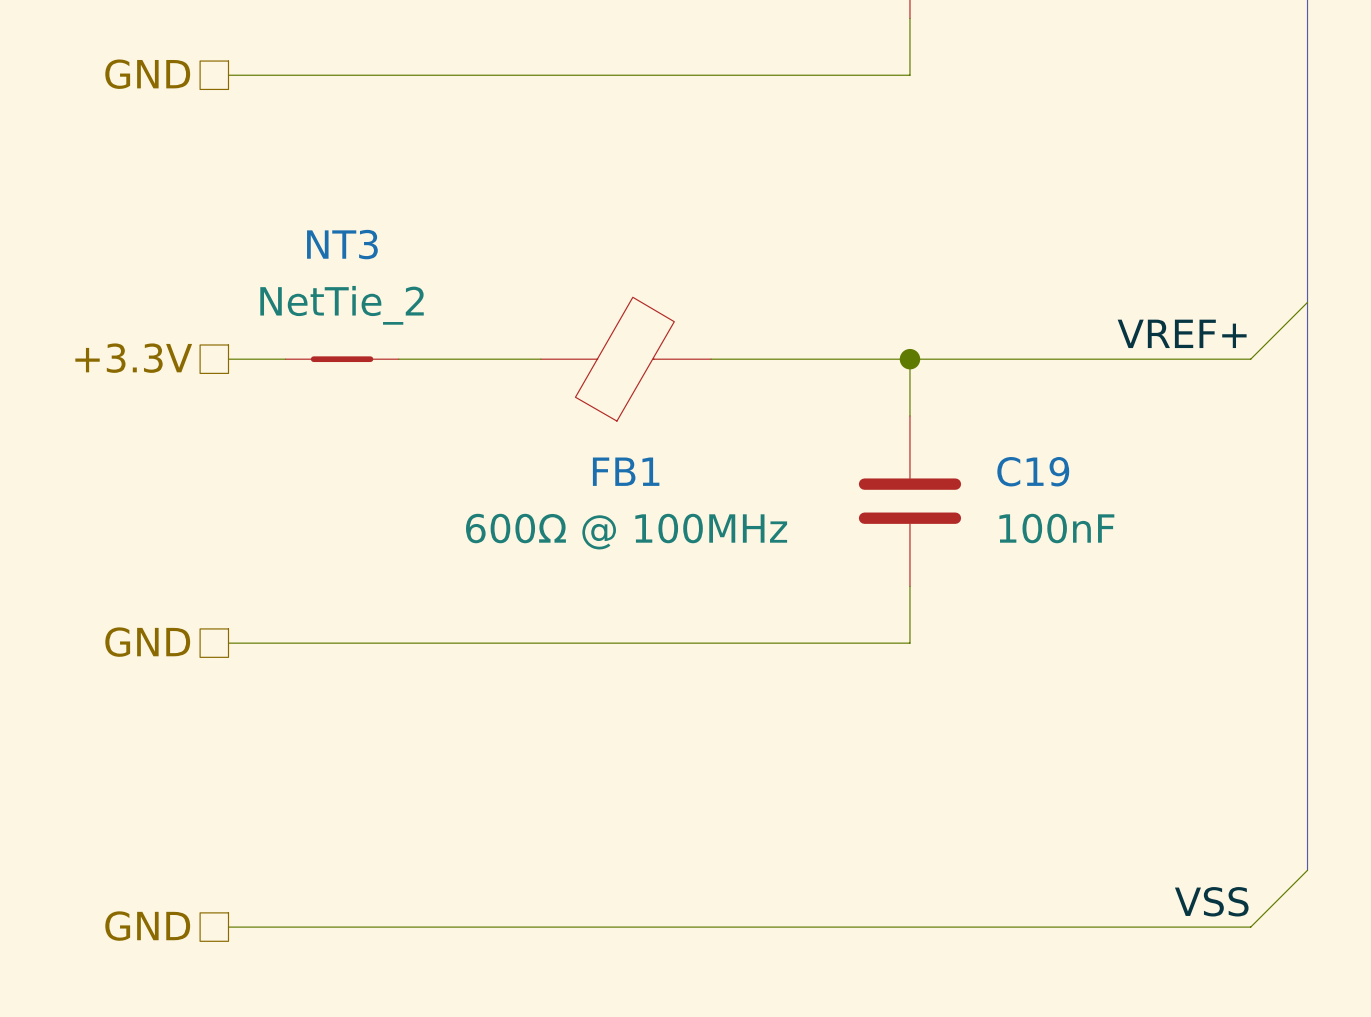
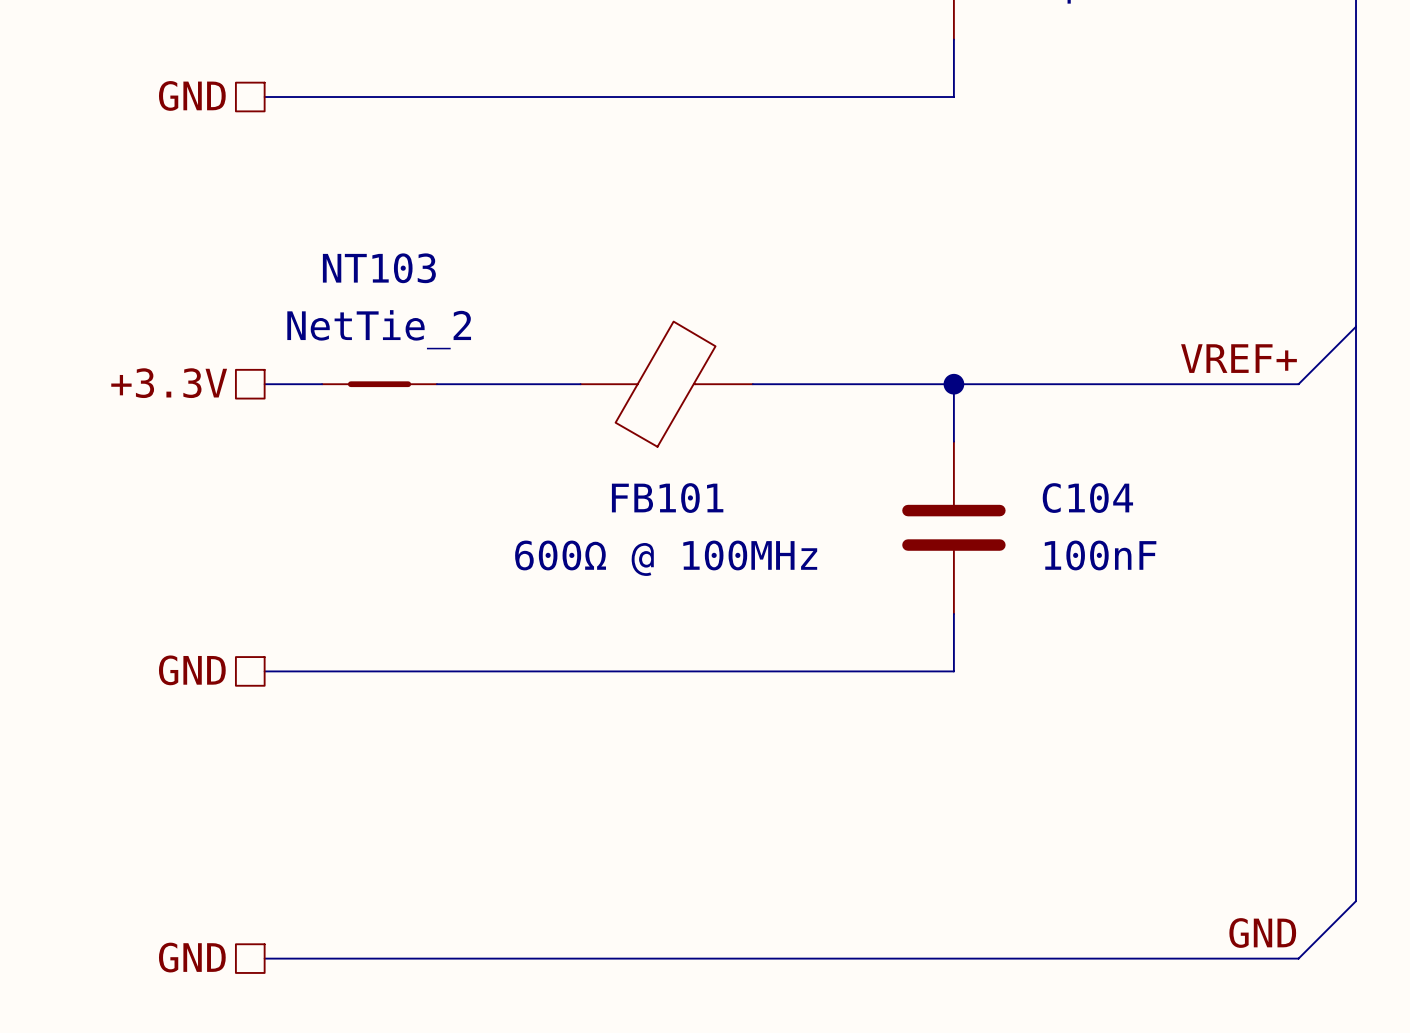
NT3 name: NT3 (342, 244) -> NT103 (379, 268)
FB1 name: FB1 (626, 471) -> FB101 (667, 498)
C19 name: C19 (1033, 471) -> C104 (1087, 498)
label: VSS (1211, 901) -> GND (1262, 933)

